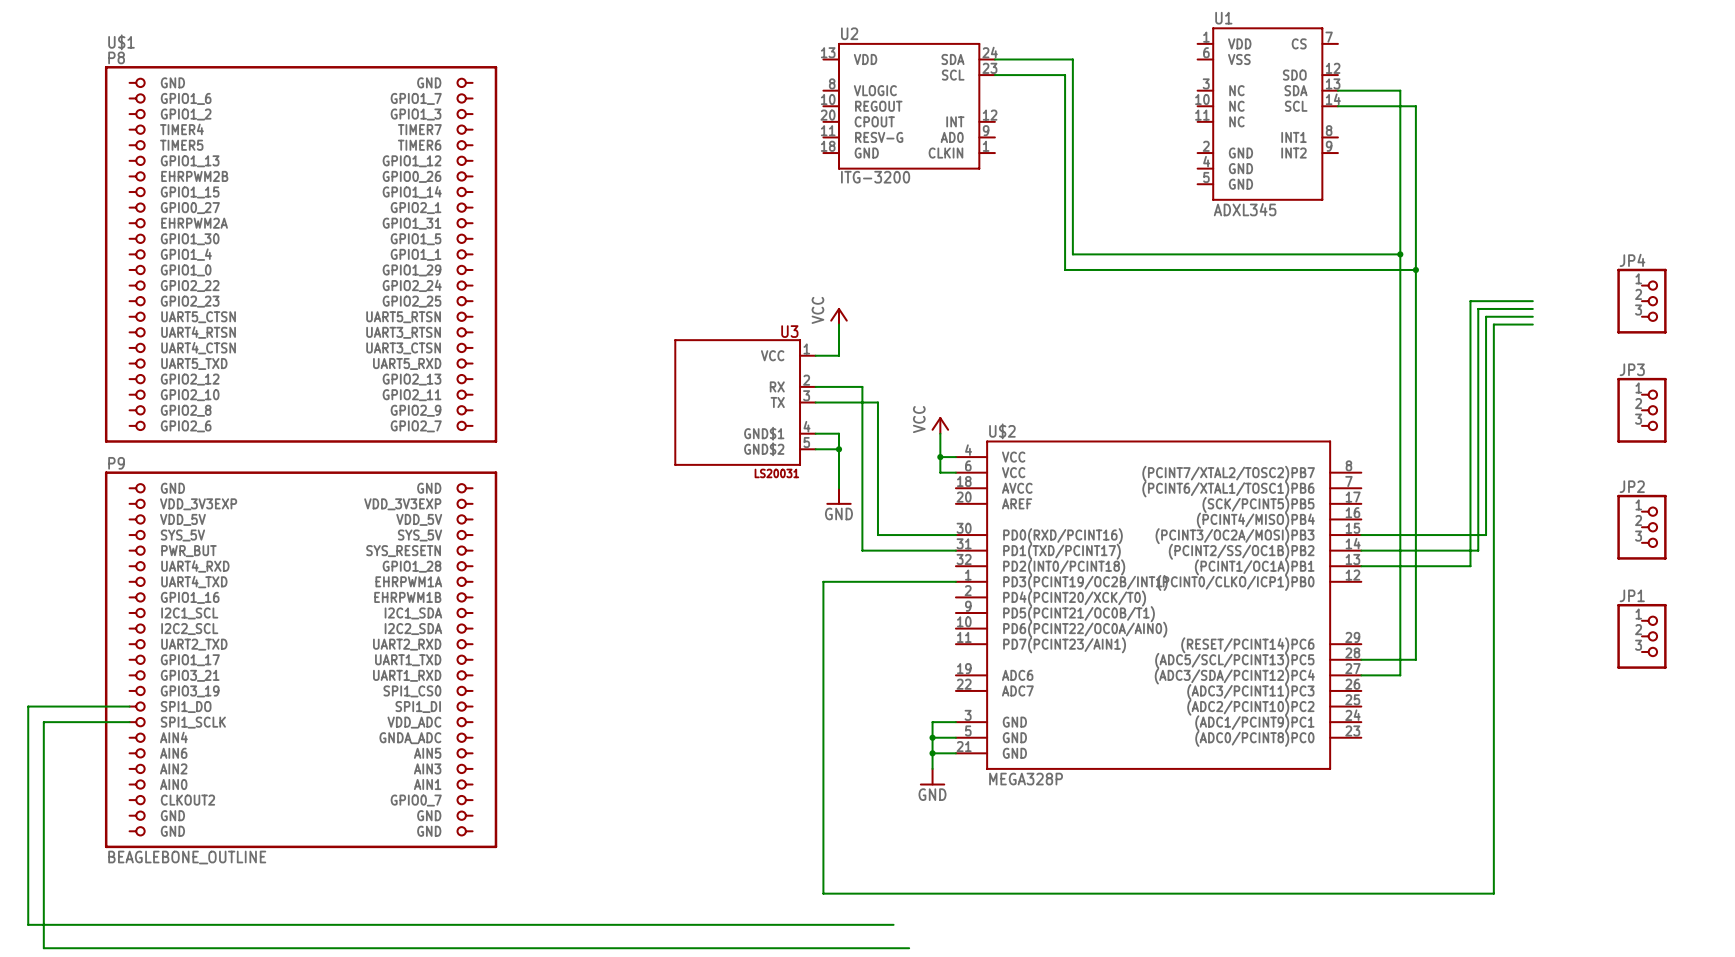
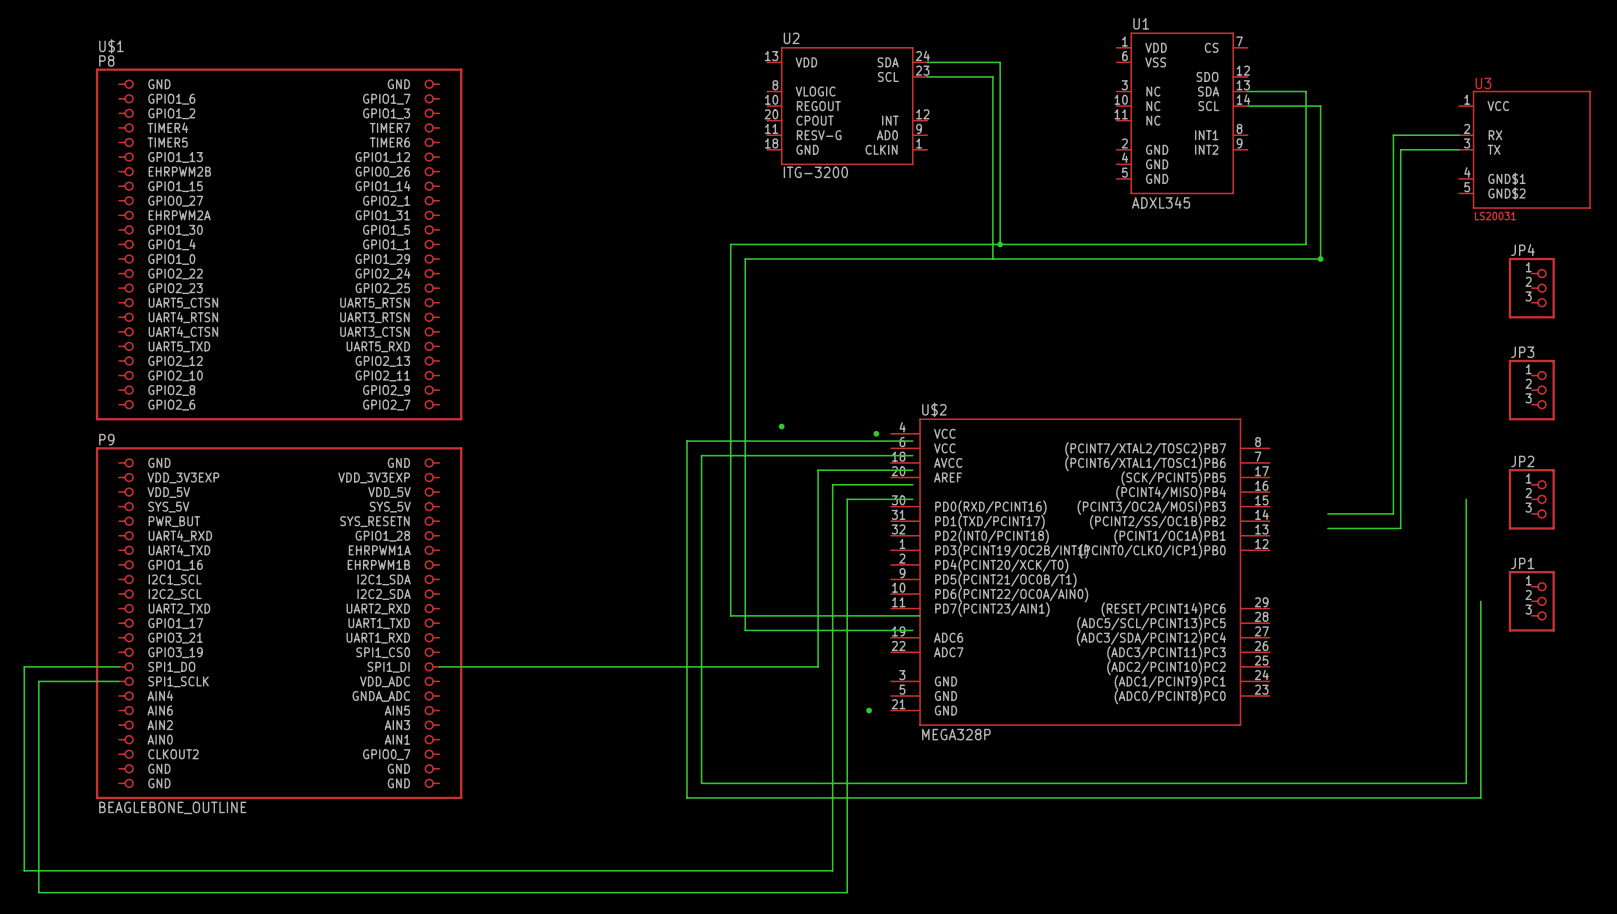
wire: none -> (1458, 149) (1400, 149) (1400, 528) (1327, 528)
wire: none -> (1000, 244) (730, 244) (730, 615) (920, 615)
junction: none -> (1000, 244)
wire: (1400, 254) (1400, 675) (1361, 675) -> none
junction: (1400, 254) -> none
wire: none -> (992, 259) (745, 259) (745, 630) (912, 630)
wire: (1415, 269) (1415, 659) (1361, 659) -> none
wire: (1532, 301) (1470, 301) (1470, 566) (1361, 566) -> none
wire: (1532, 308) (1478, 308) (1478, 550) (1361, 550) -> none
power symbol: VCC (839, 316) -> none
wire: (1532, 316) (1486, 316) (1486, 535) (1361, 535) -> none
wire: (839, 324) (839, 355) (815, 355) -> none
wire: (1493, 324) (1532, 324) -> (1393, 310) (1393, 135) (1458, 135)
wire: (815, 386) (862, 386) (862, 550) (955, 550) -> none
U3 flip: as is (737, 402) -> left-right (1531, 149)
U3 position: (745, 402) -> (1524, 149)
wire: (815, 402) (877, 402) (877, 496) -> (912, 470) (818, 470)
power symbol: VCC (940, 425) -> none
wire: (815, 433) (839, 433) (839, 488) -> none
wire: (940, 433) (940, 472) (955, 472) -> none
wire: (815, 449) (839, 449) -> none
wire: (940, 457) (955, 457) -> none
wire: none -> (912, 441) (687, 441) (687, 797) (1480, 797) (1480, 601)
wire: none -> (912, 455) (701, 455) (701, 783) (1466, 783) (1466, 499)
power symbol: GND (839, 496) -> none
wire: none -> (912, 484) (832, 484) (832, 870)
wire: none -> (912, 499) (847, 499) (847, 892)
wire: (877, 535) (955, 535) -> (818, 506) (818, 666) (439, 666)
wire: (1493, 542) (1493, 893) (823, 893) (823, 581) (955, 581) -> (1393, 513) (1327, 513)
wire: (955, 722) (932, 722) (932, 768) -> none
wire: (932, 737) (955, 737) -> none
junction: (932, 737) -> none
wire: (932, 753) (955, 753) -> none
power symbol: GND (932, 777) -> none

